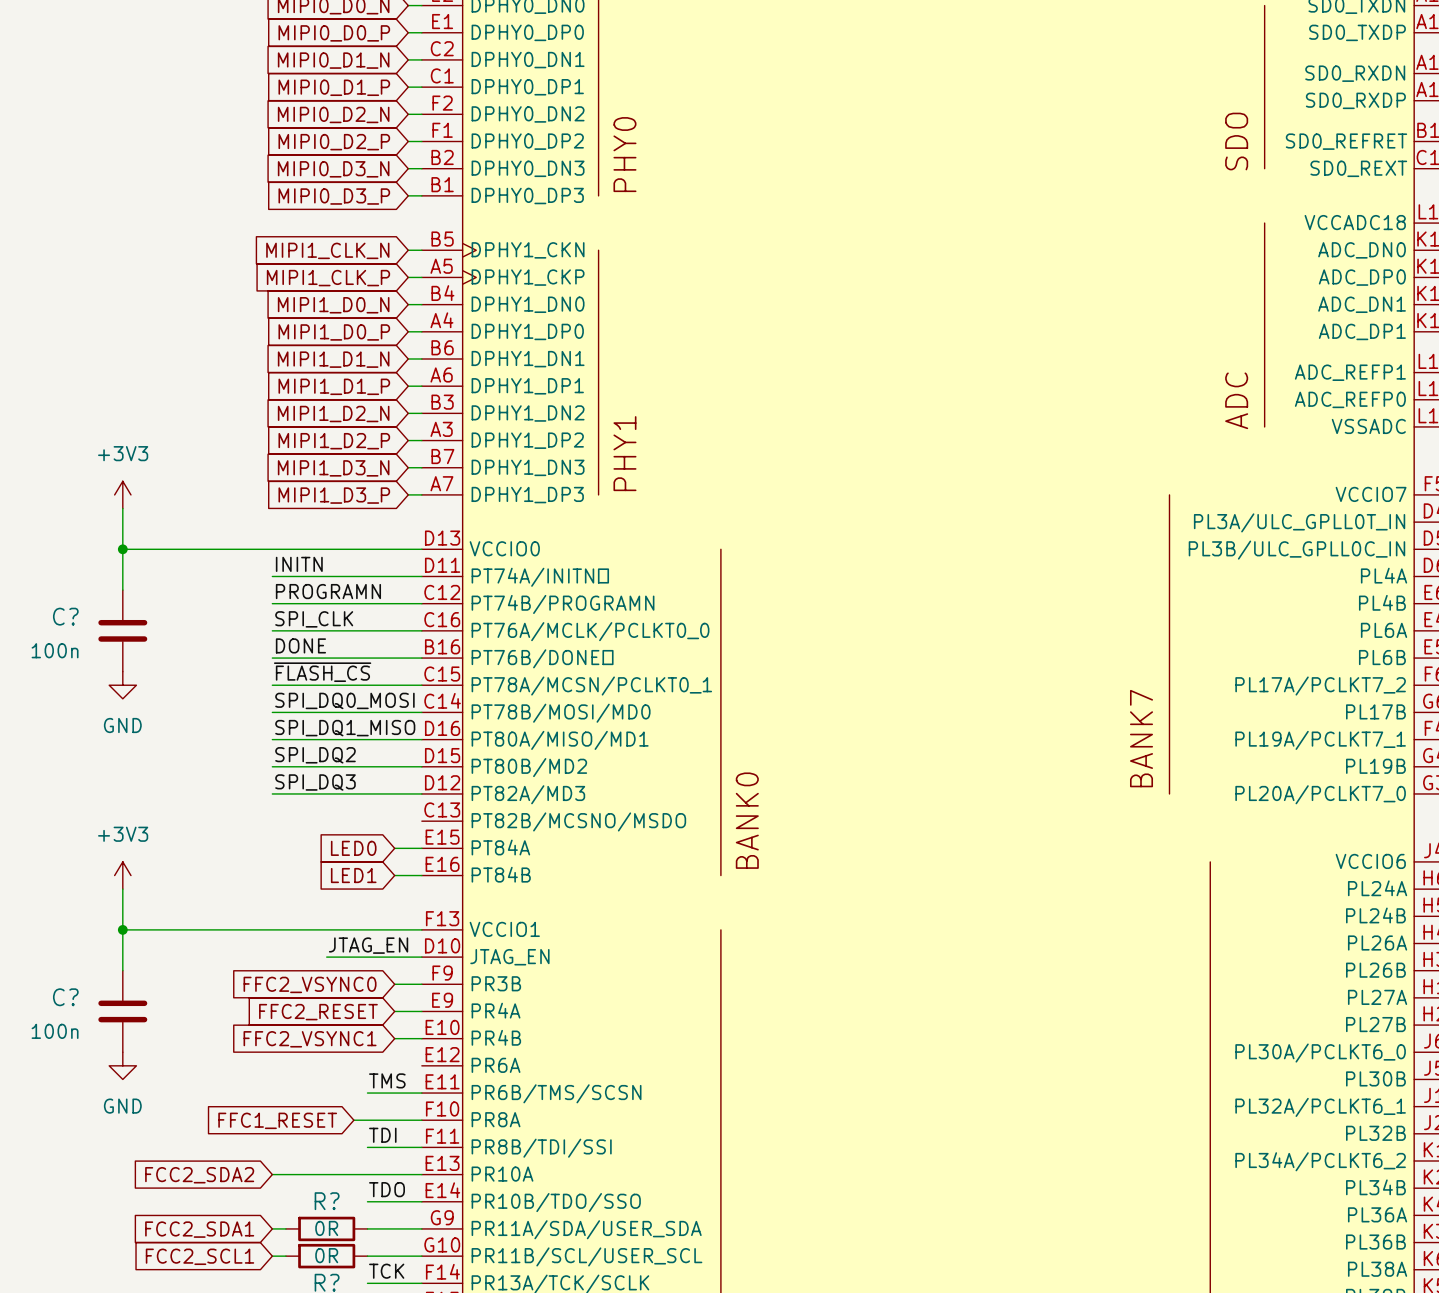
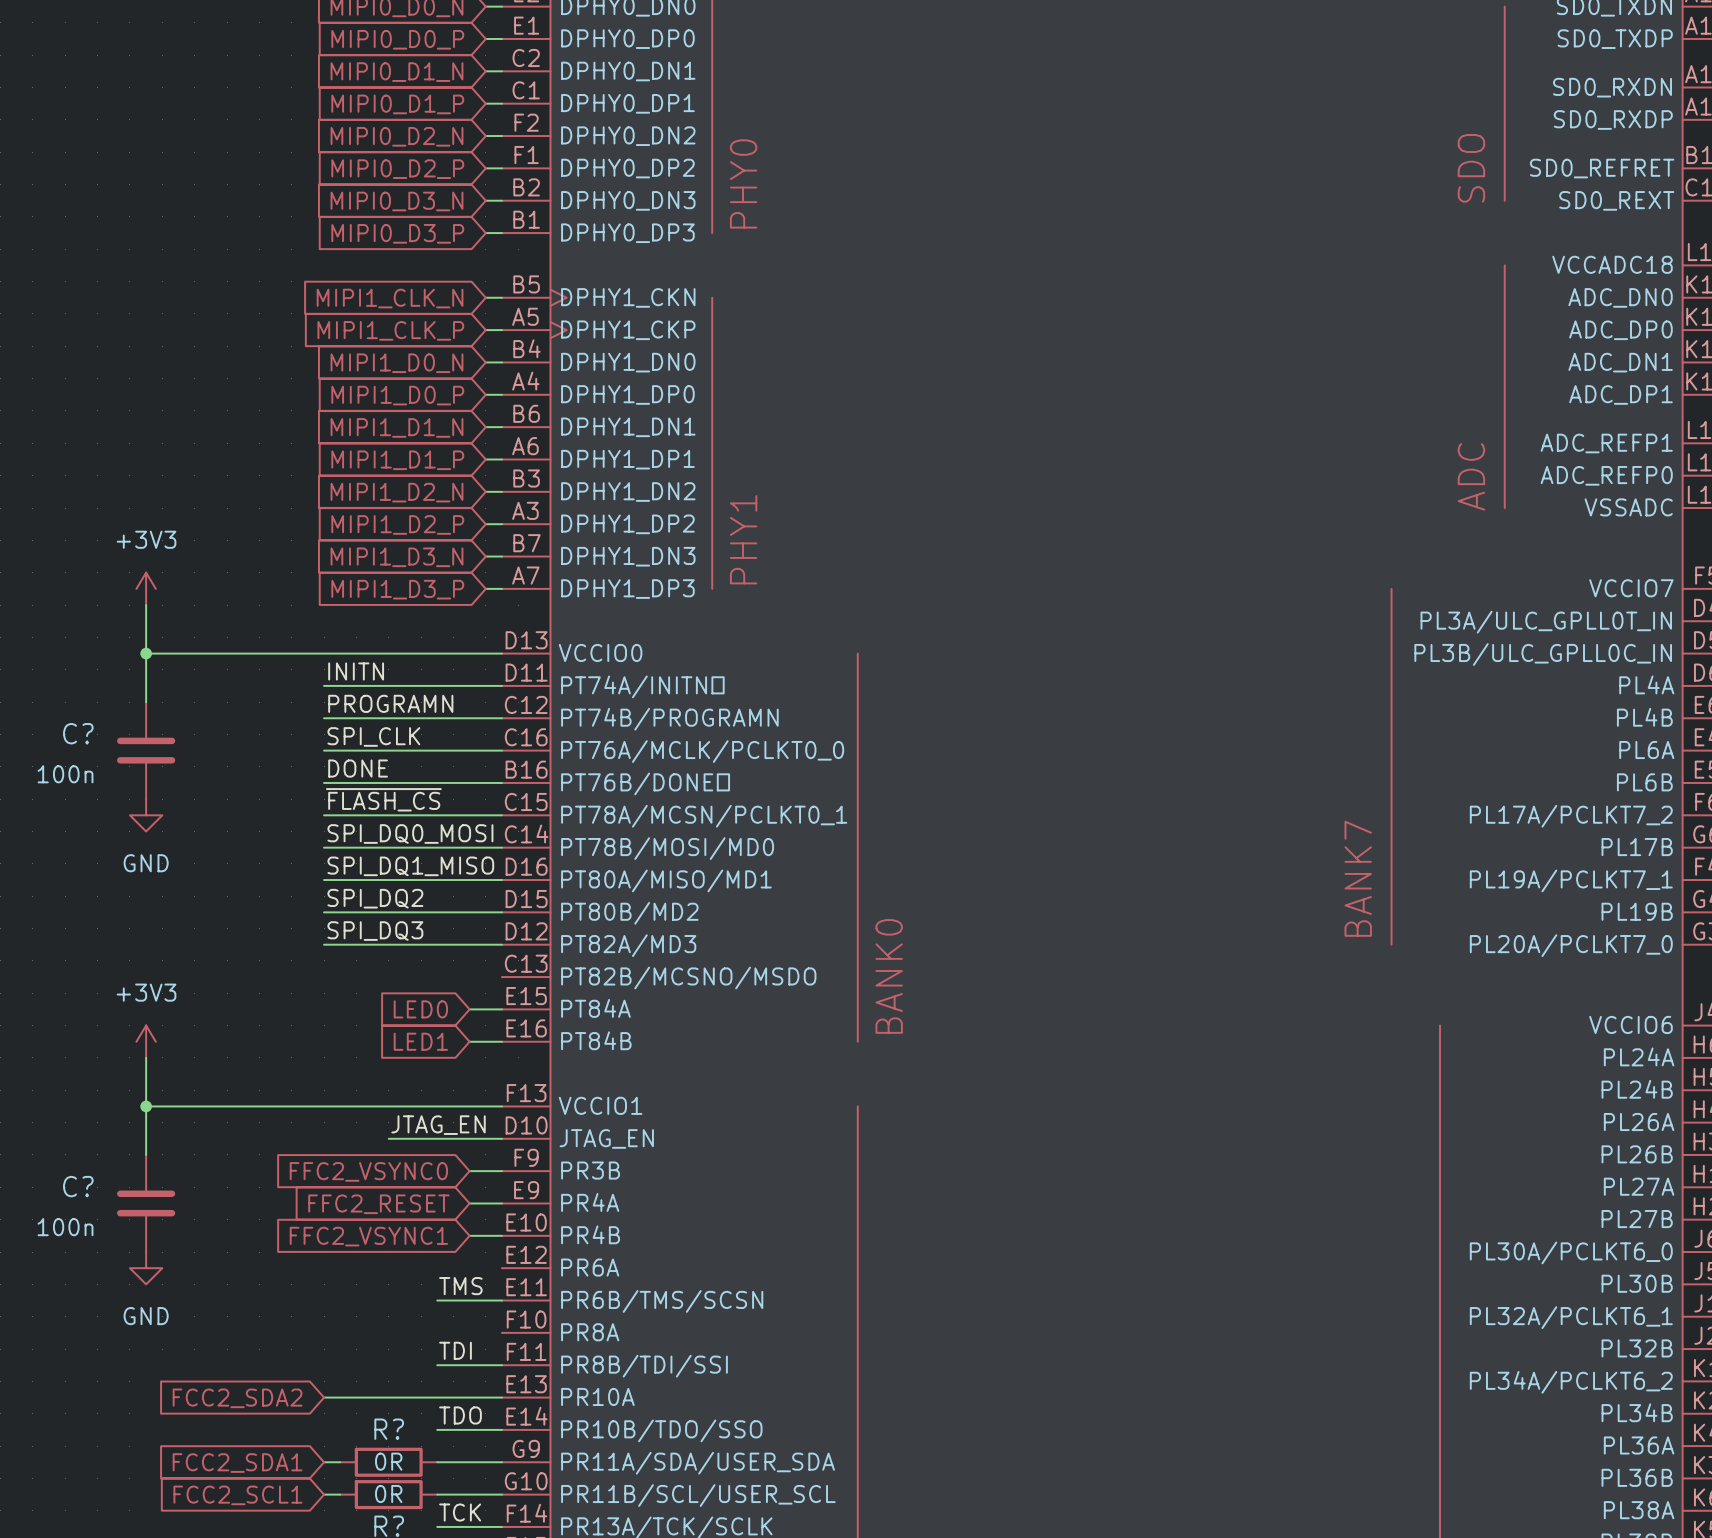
global label: FFC1_RESET (277, 1120) -> none
wire: (353, 1120) (421, 1120) -> none

